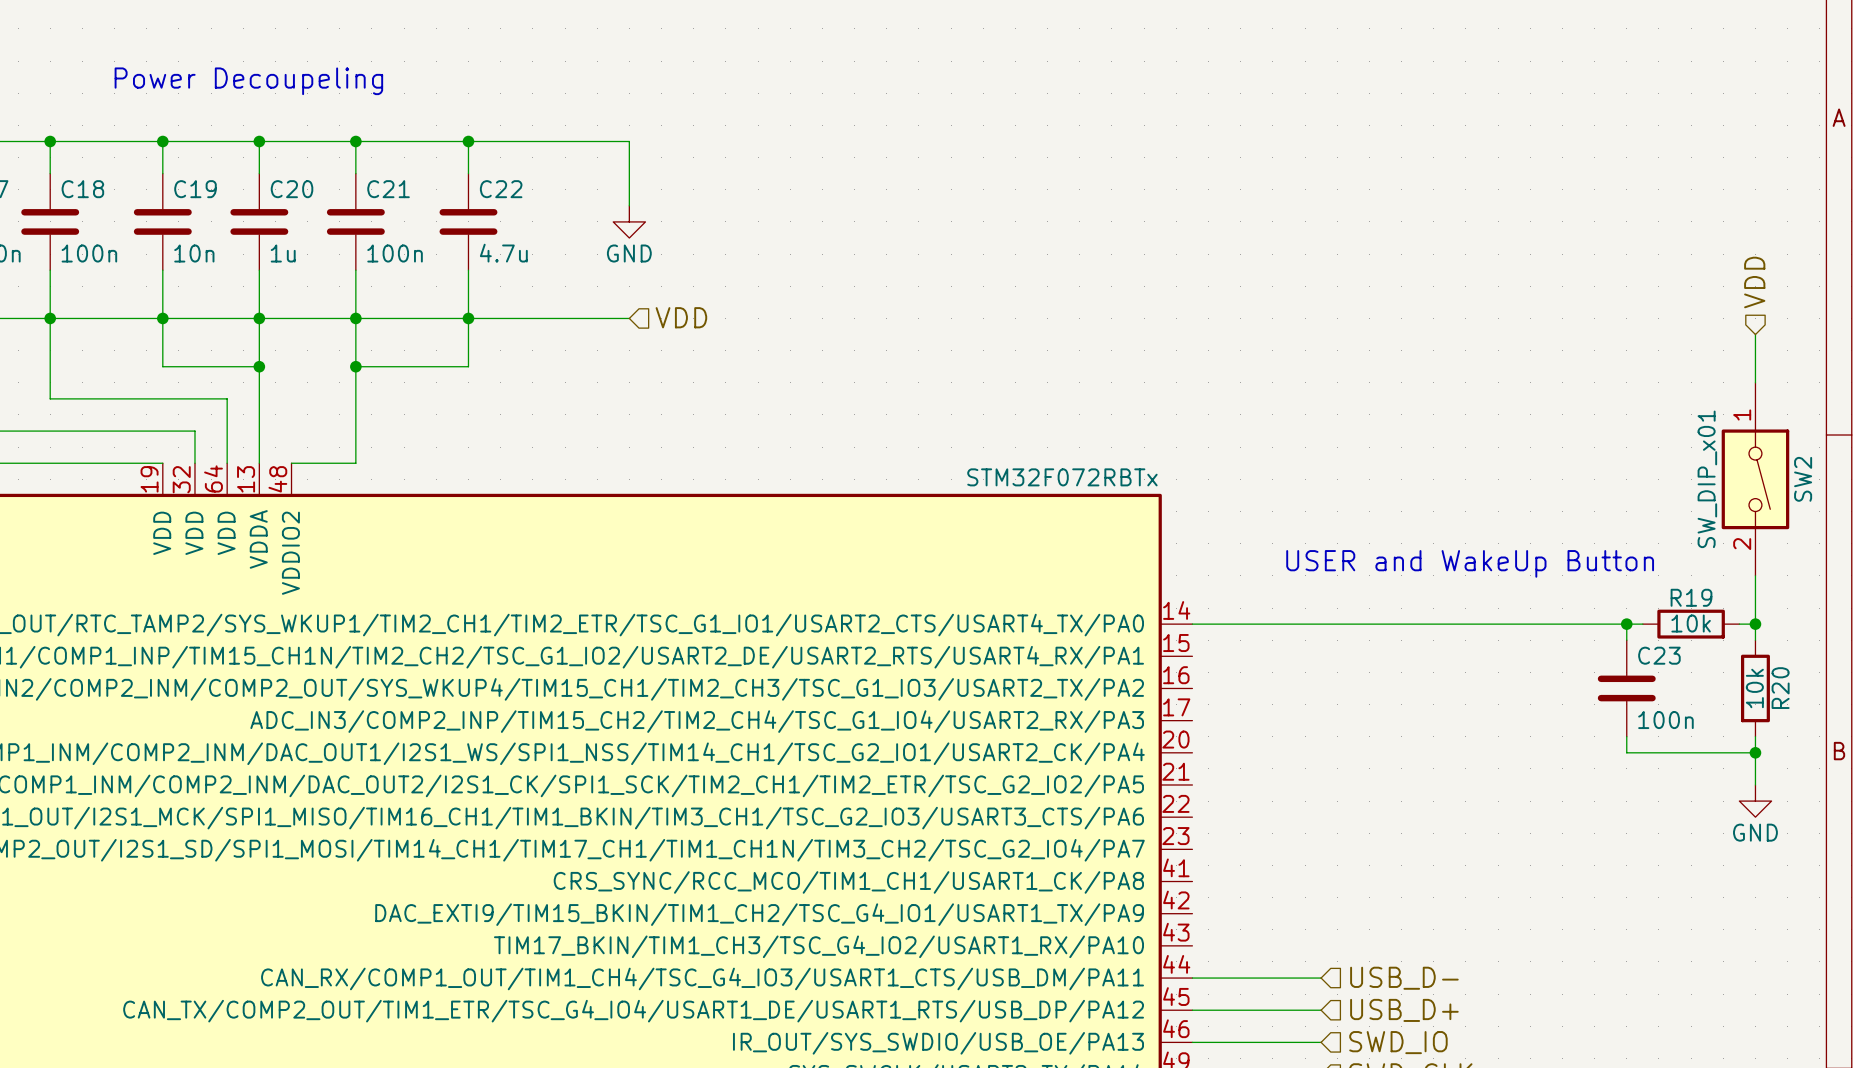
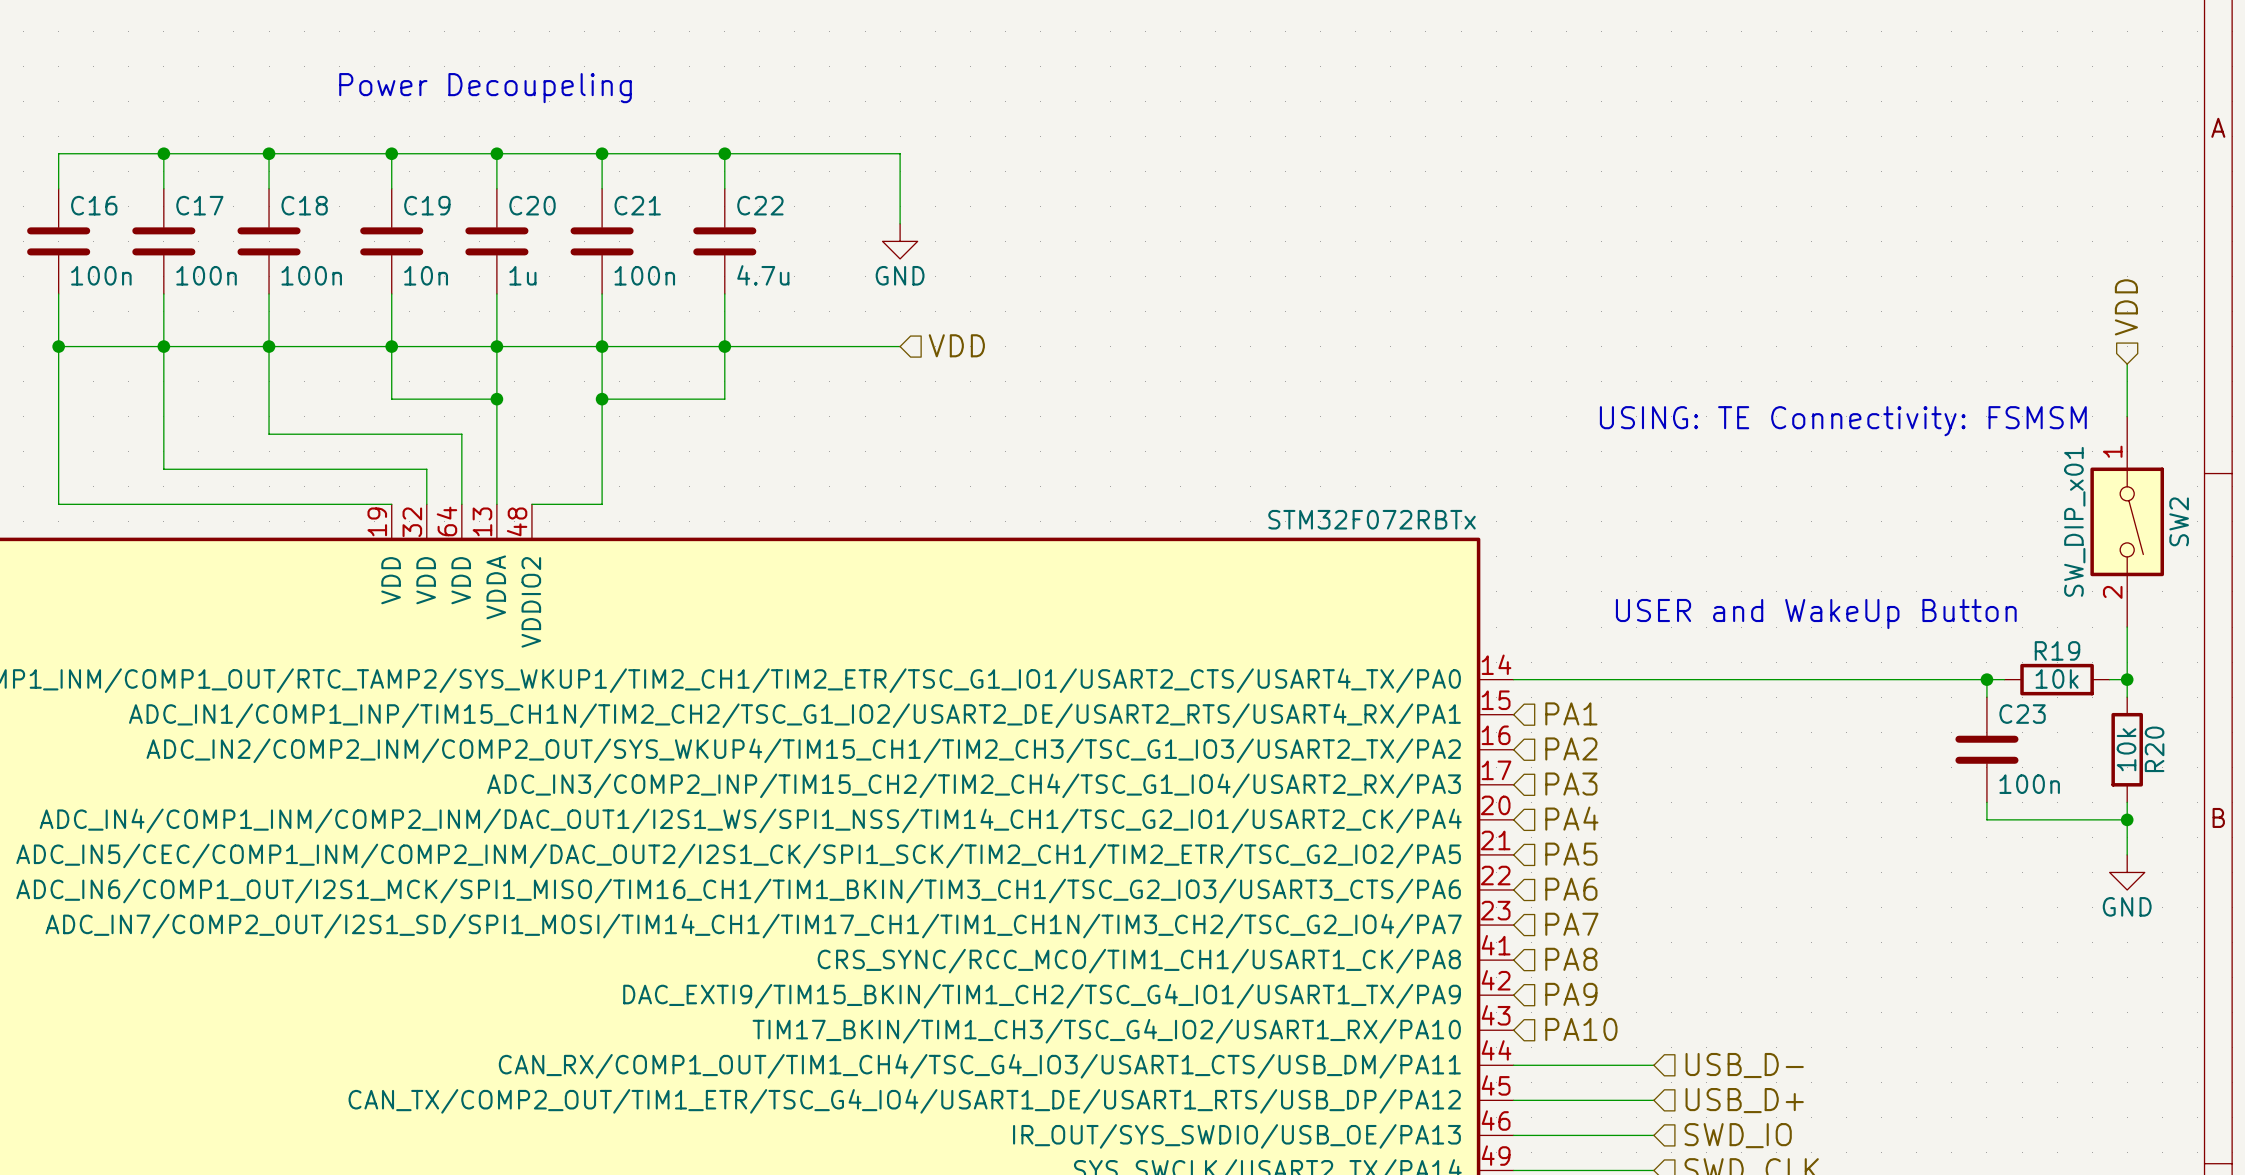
text: none -> USING: TE Connectivity: FSMSM (1843, 421)
hierarchical label: none -> PA1 (1571, 713)
hierarchical label: none -> PA2 (1571, 748)
hierarchical label: none -> PA3 (1571, 784)
hierarchical label: none -> PA4 (1571, 818)
hierarchical label: none -> PA5 (1571, 854)
hierarchical label: none -> PA6 (1571, 889)
hierarchical label: none -> PA7 (1571, 924)
hierarchical label: none -> PA8 (1571, 959)
hierarchical label: none -> PA9 (1571, 994)
hierarchical label: none -> PA10 (1581, 1029)

